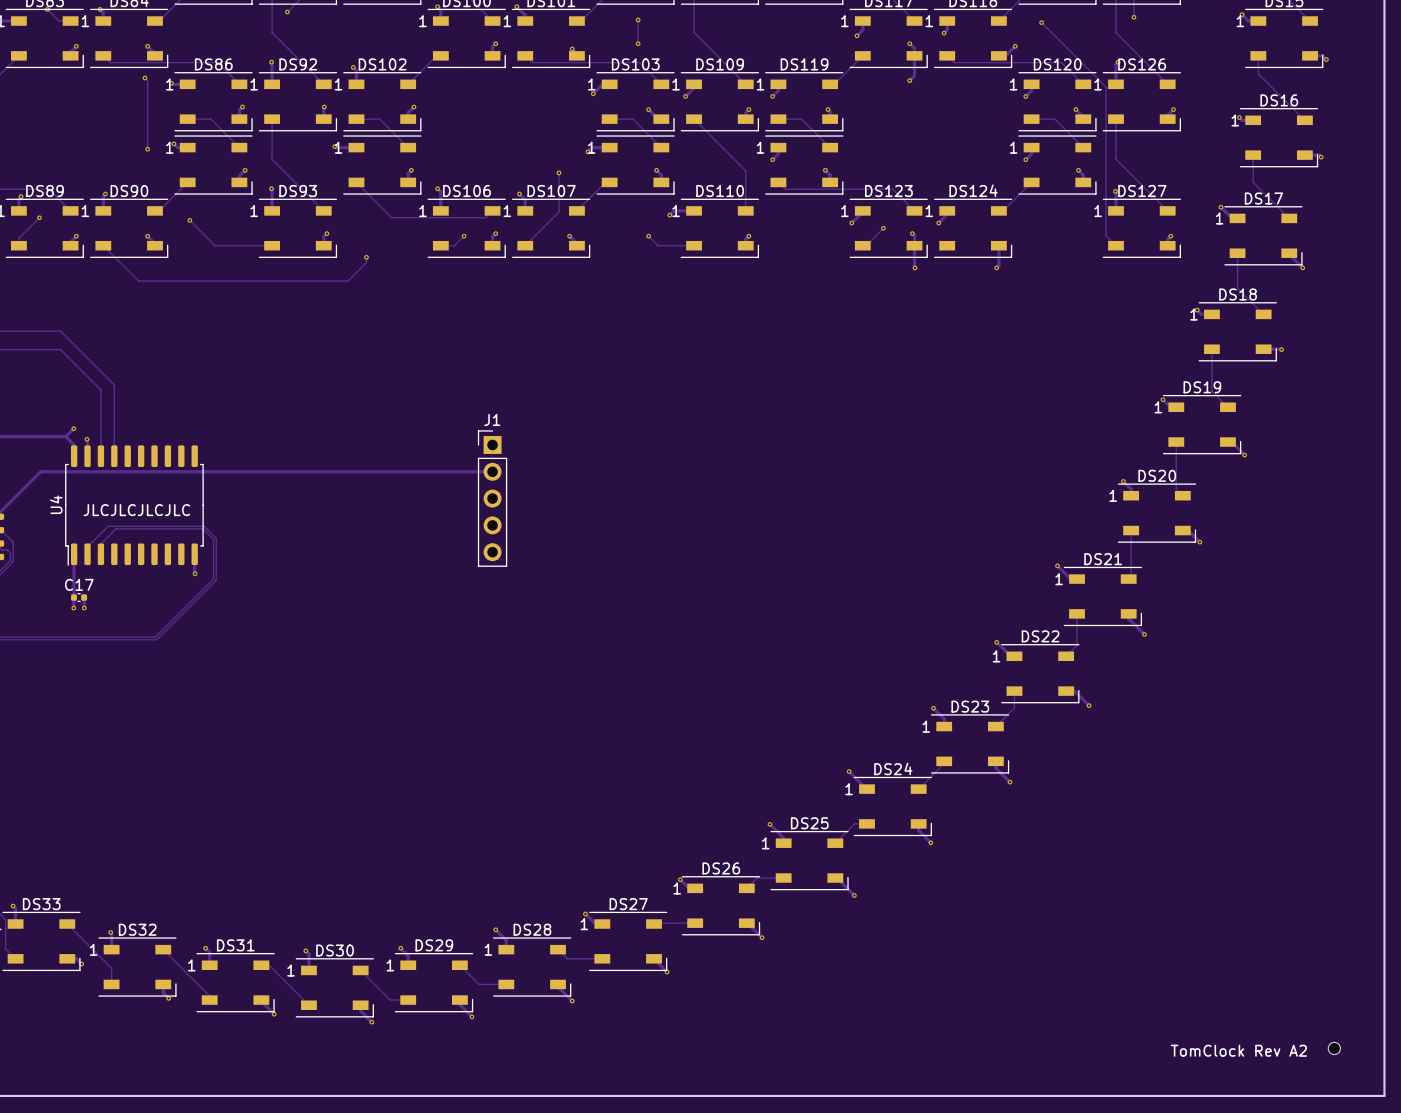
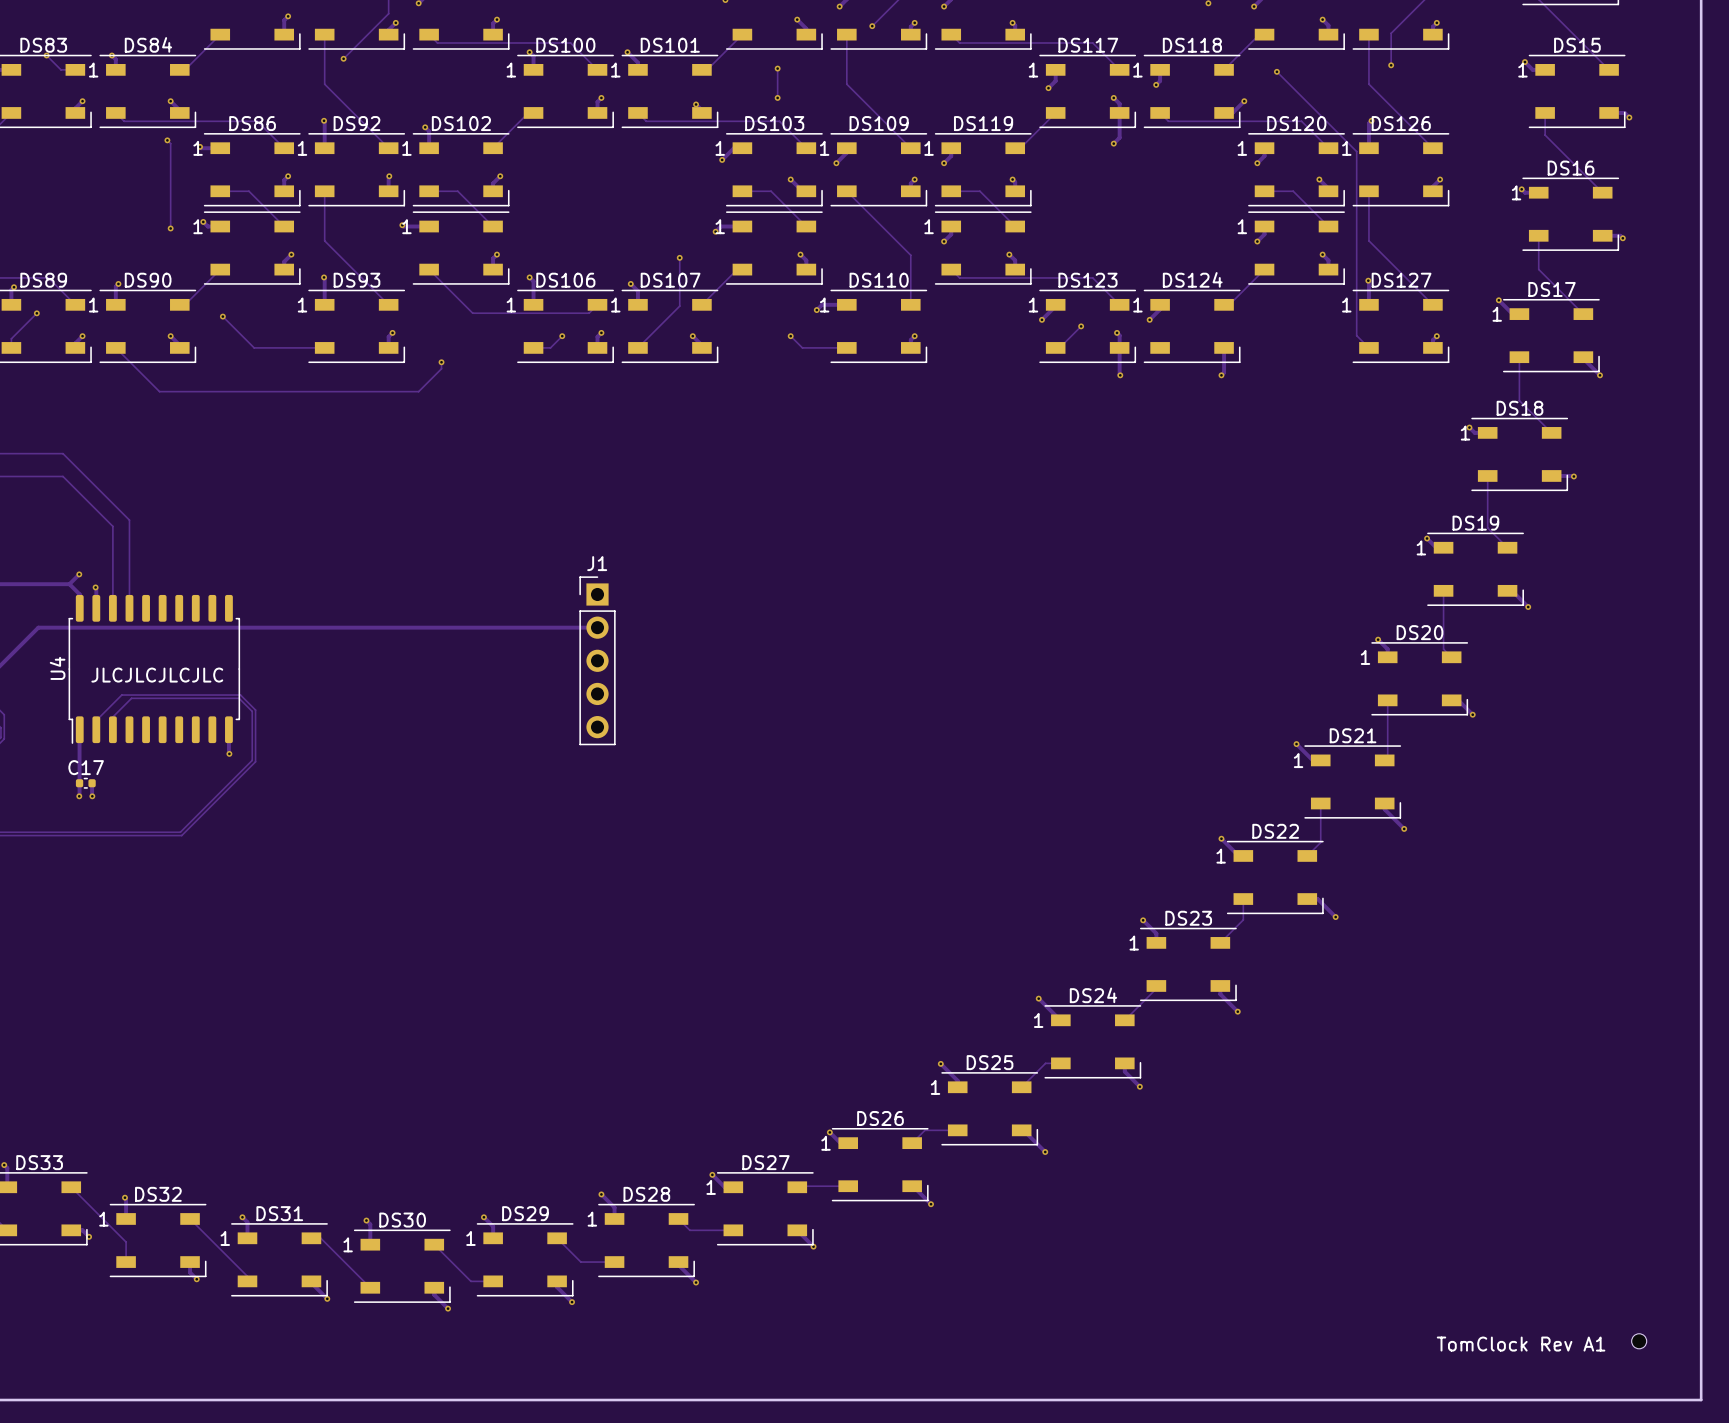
text: TomClock Rev A2 (1238, 1050) -> TomClock Rev A1 (1521, 1344)

